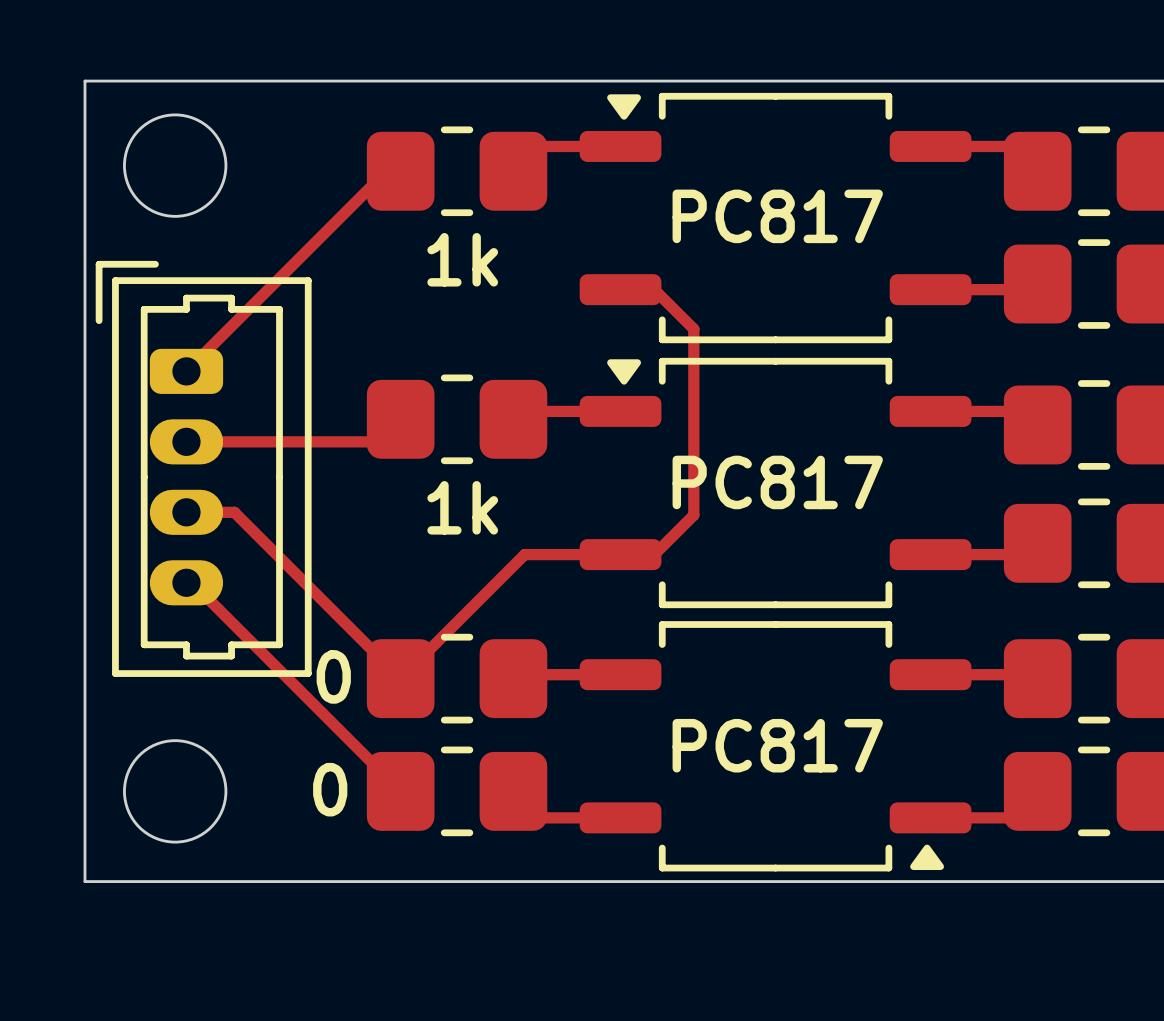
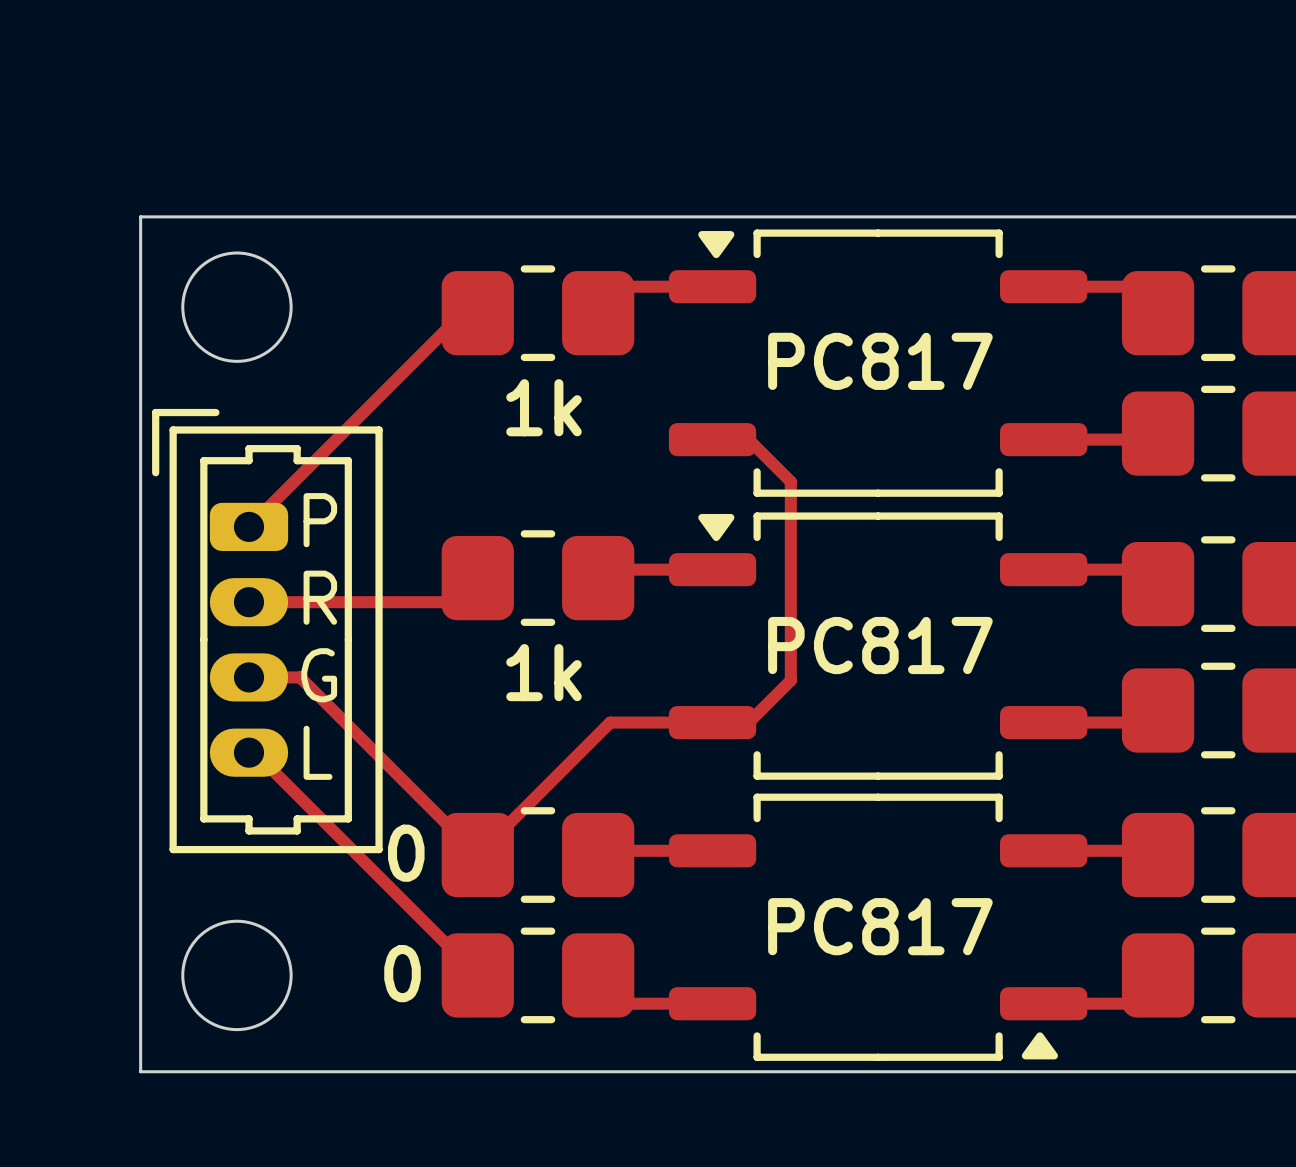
text: none -> P (320, 520)
text: none -> R (320, 597)
text: none -> G (319, 675)
text: none -> L (318, 752)

